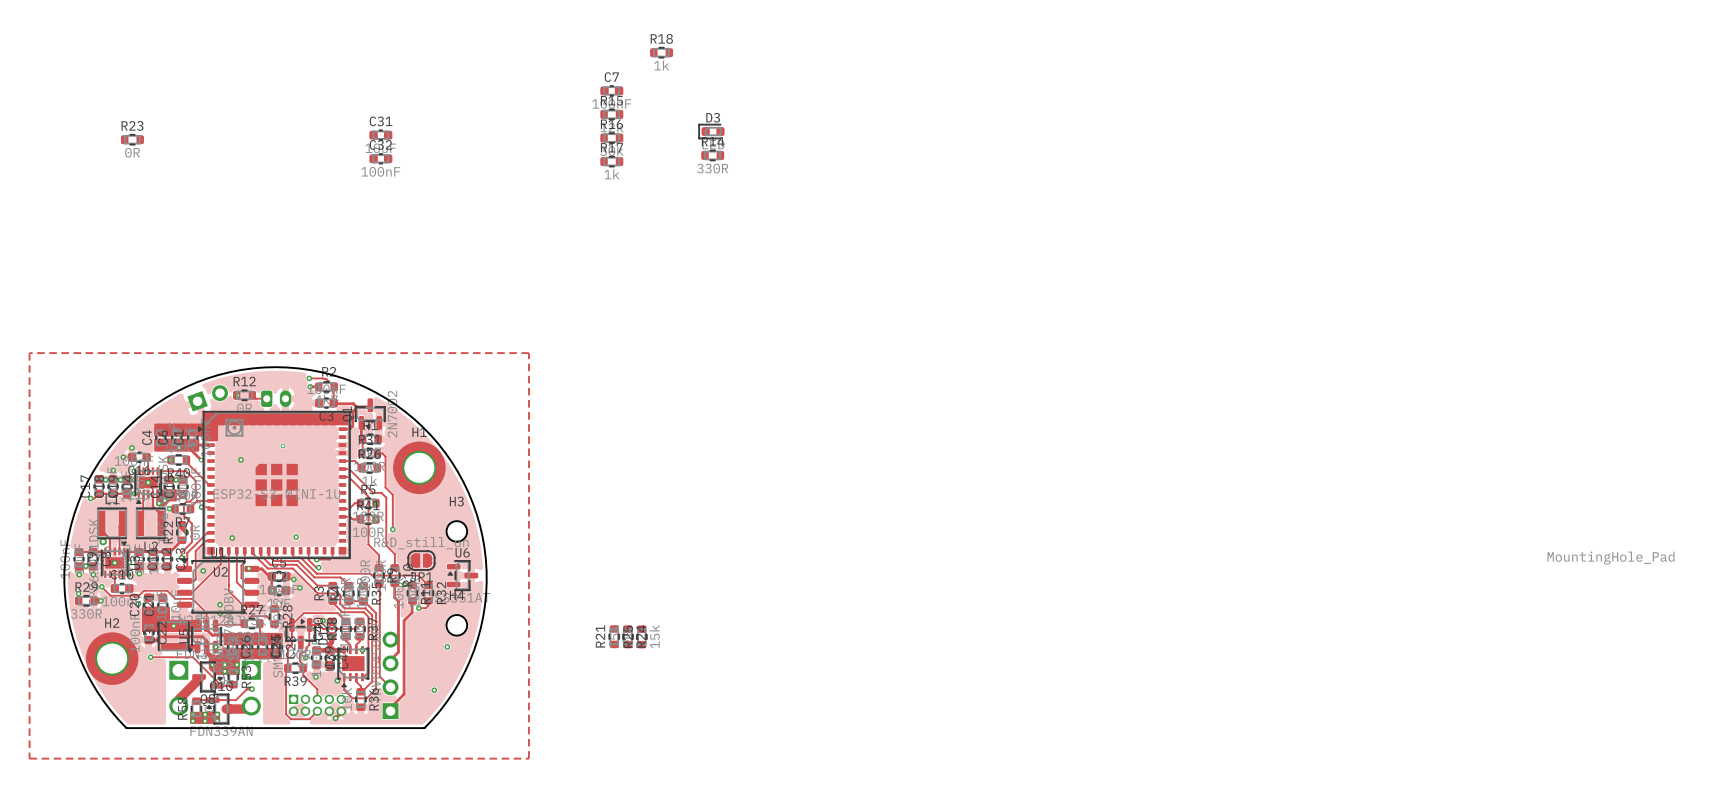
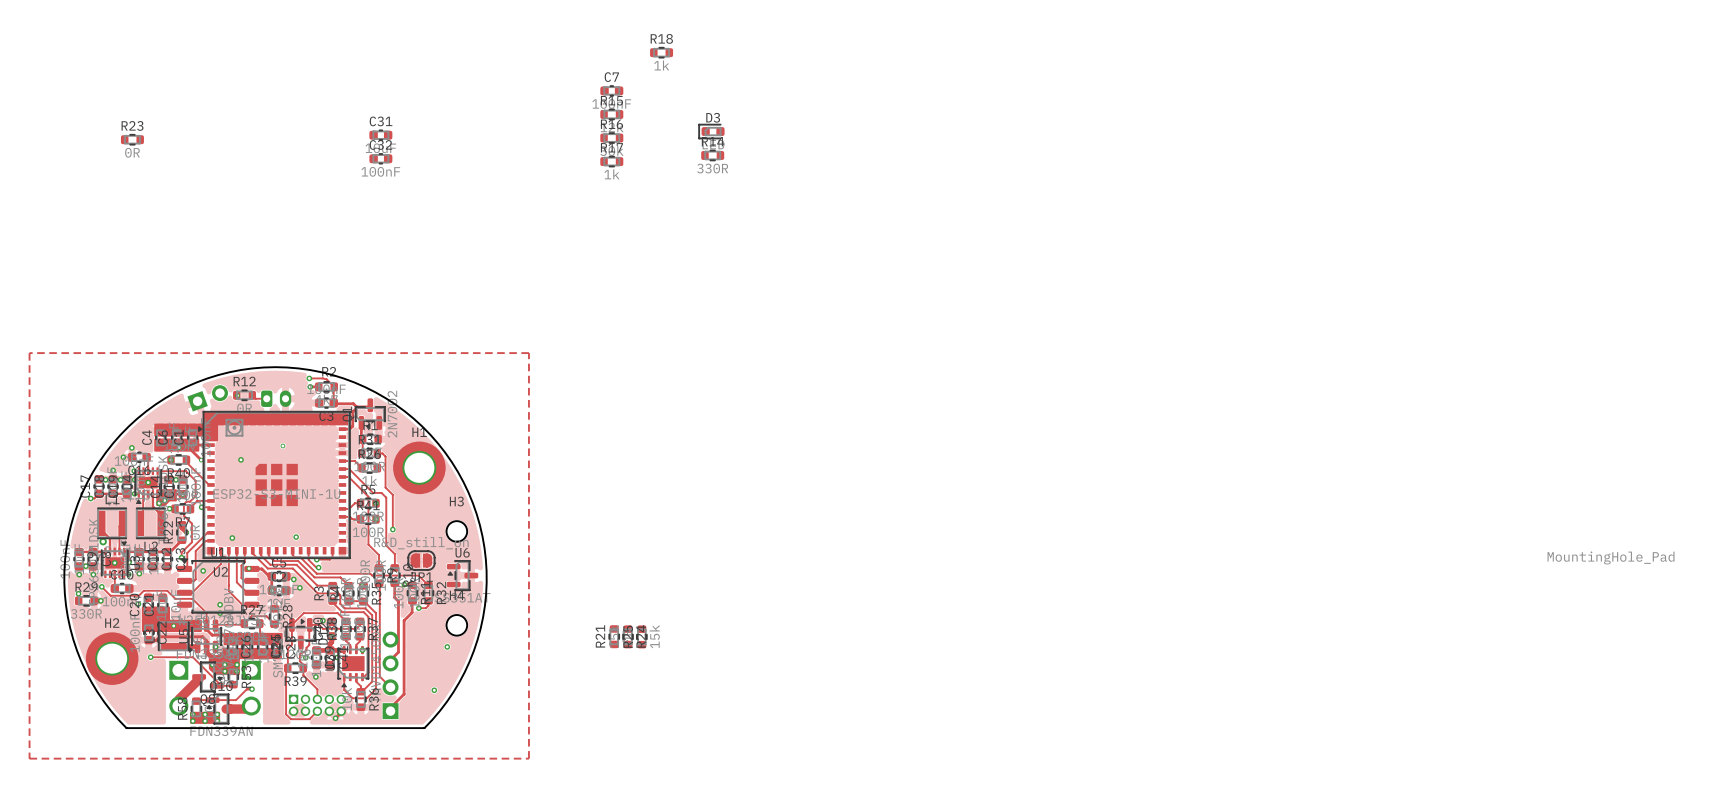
via: (337, 680) -> none

